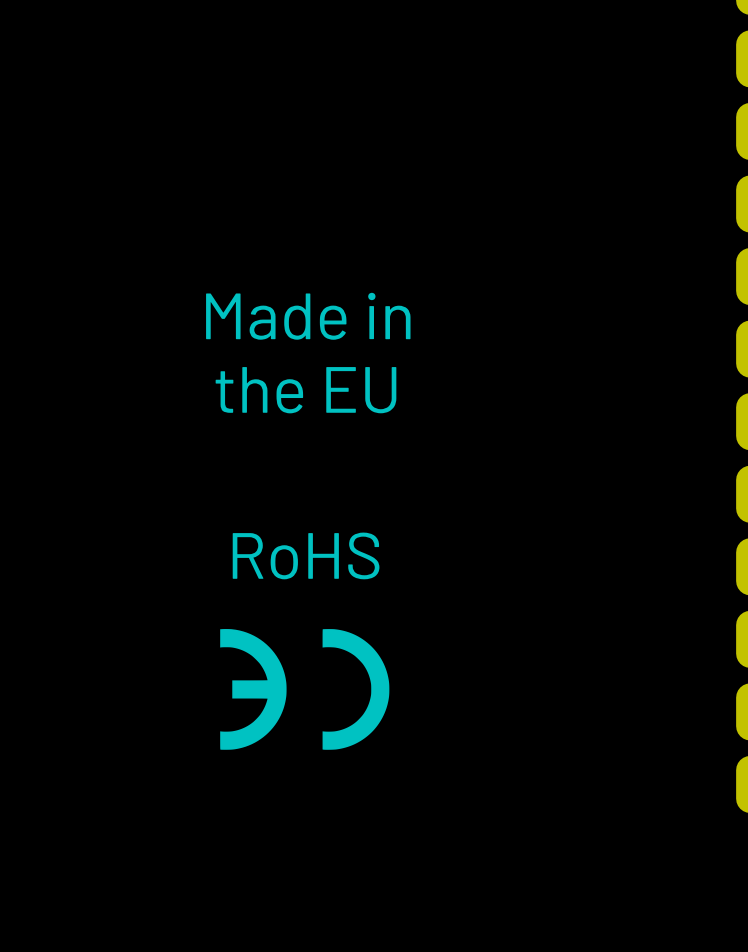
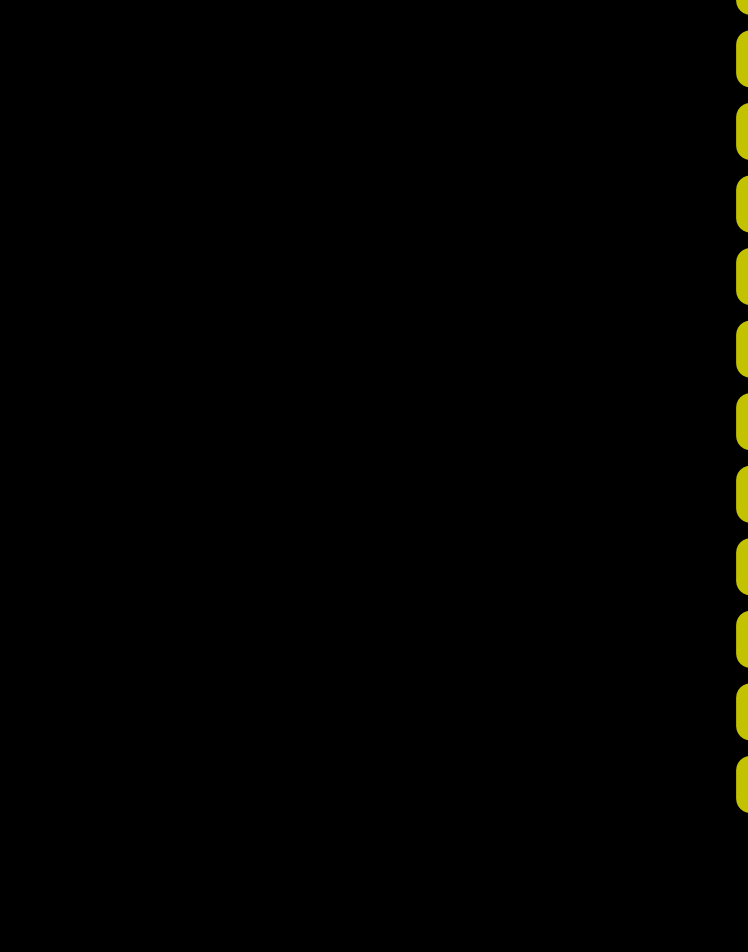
text: Made in (308, 316) -> none
text: the EU (305, 390) -> none
text: RoHS (306, 555) -> none
drawing: [220, 629, 390, 750] -> none

